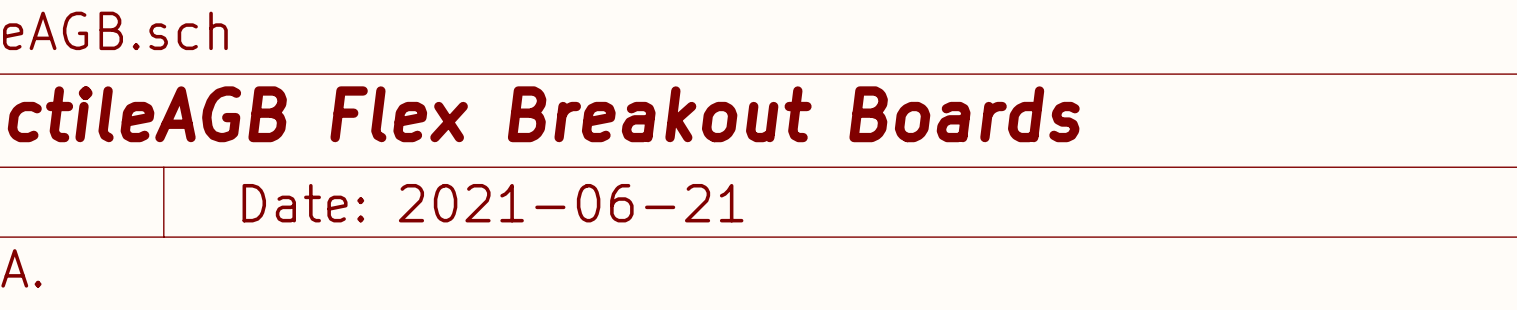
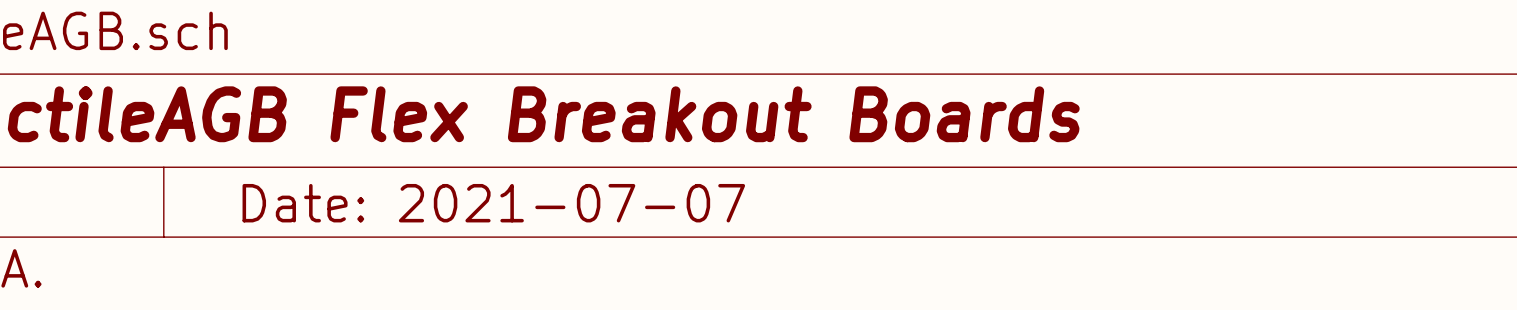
title block: Date: 2021-06-21 (492, 203) -> Date: 2021-07-07 (493, 203)

